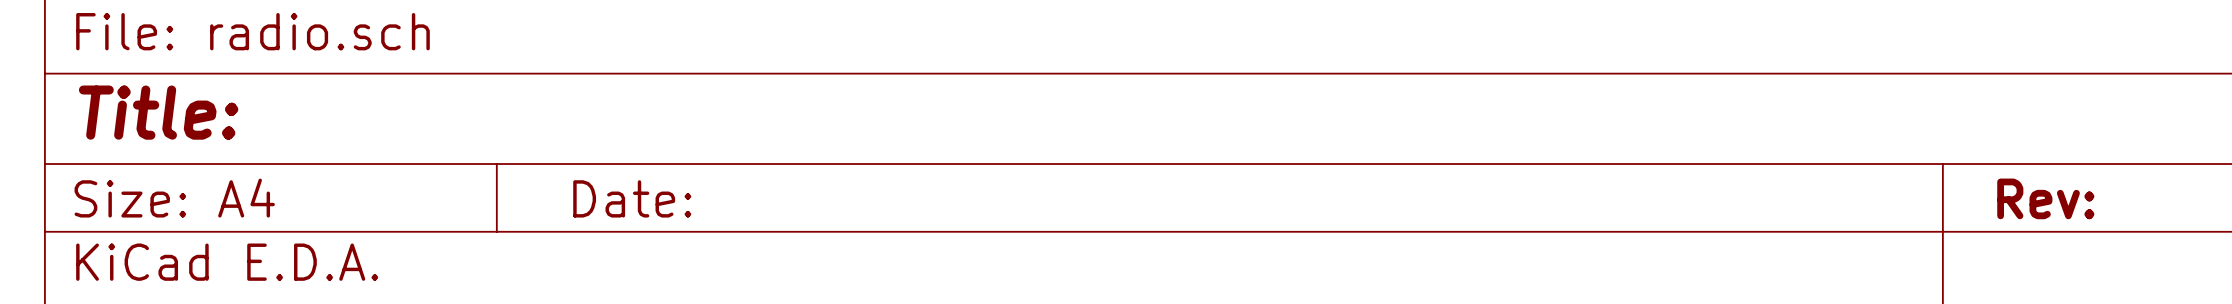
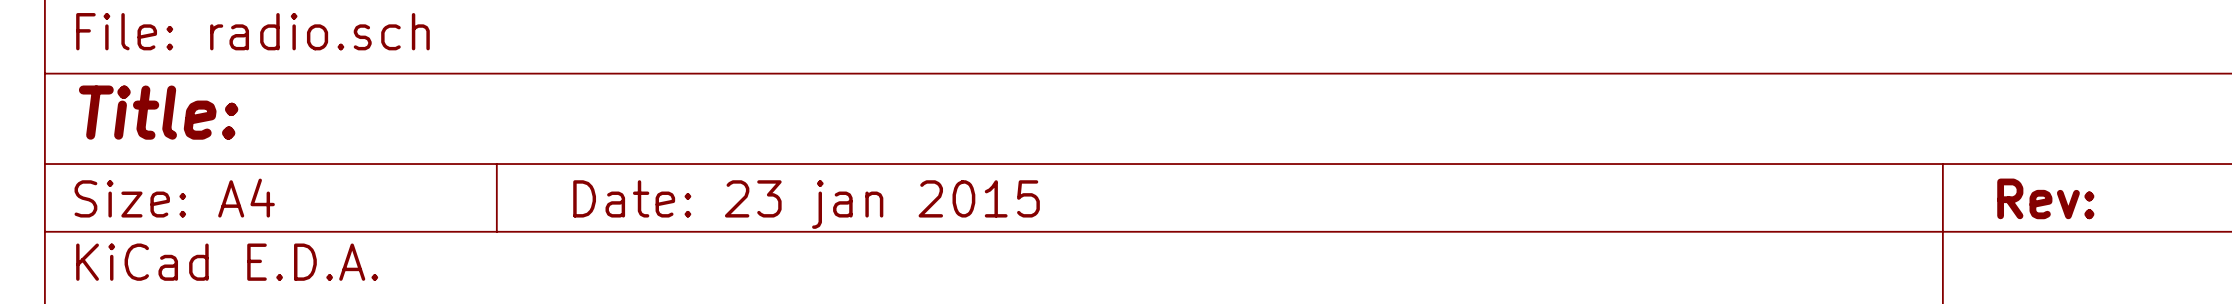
title block: Date: (632, 198) -> Date: 23 jan 2015 (806, 204)

